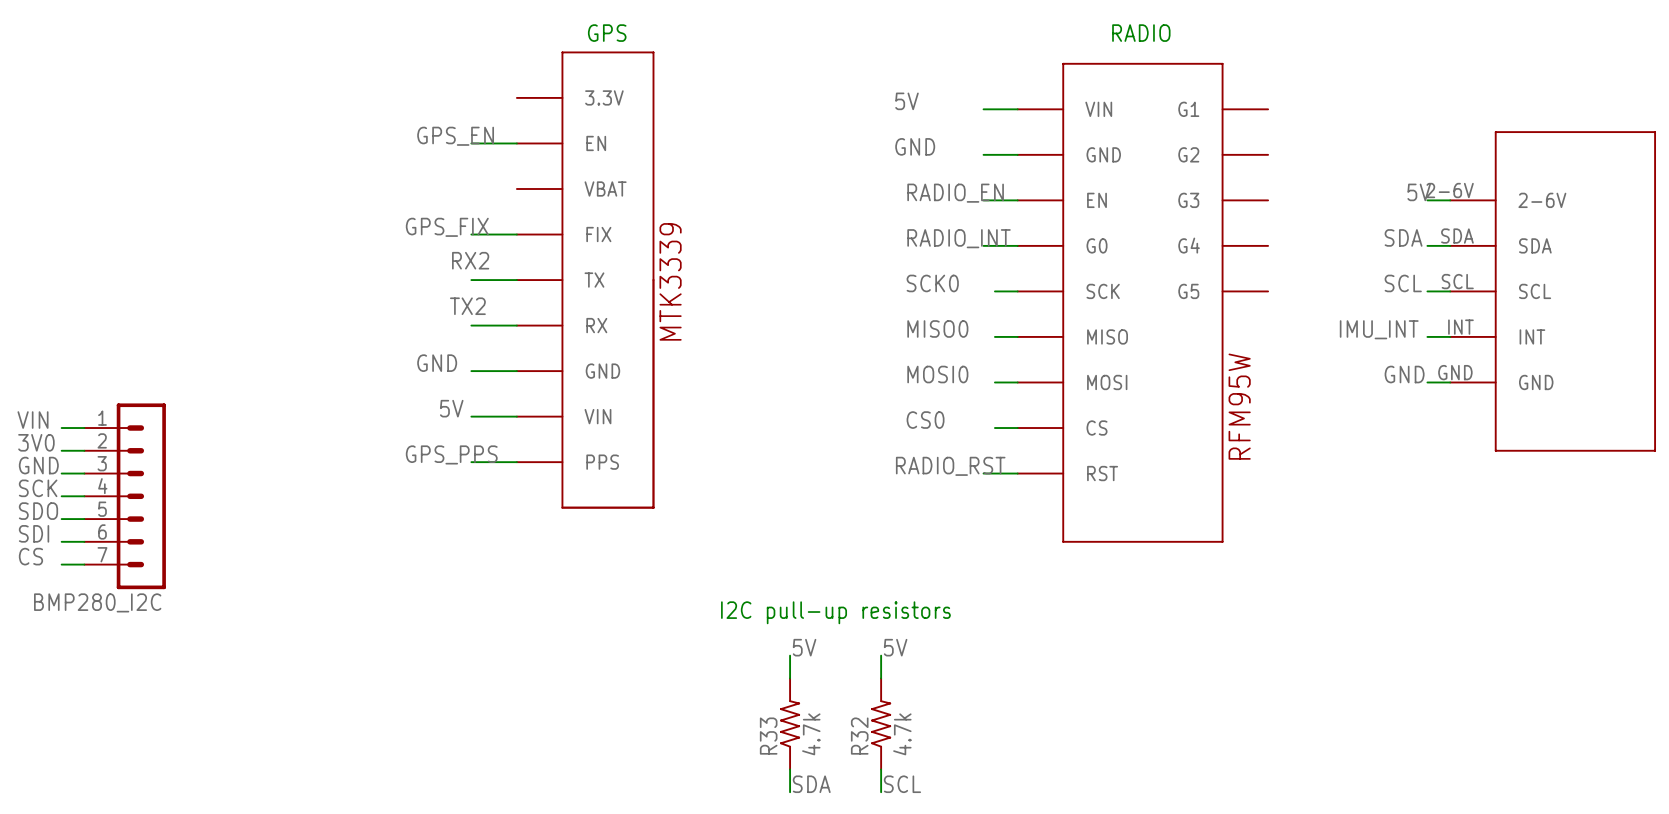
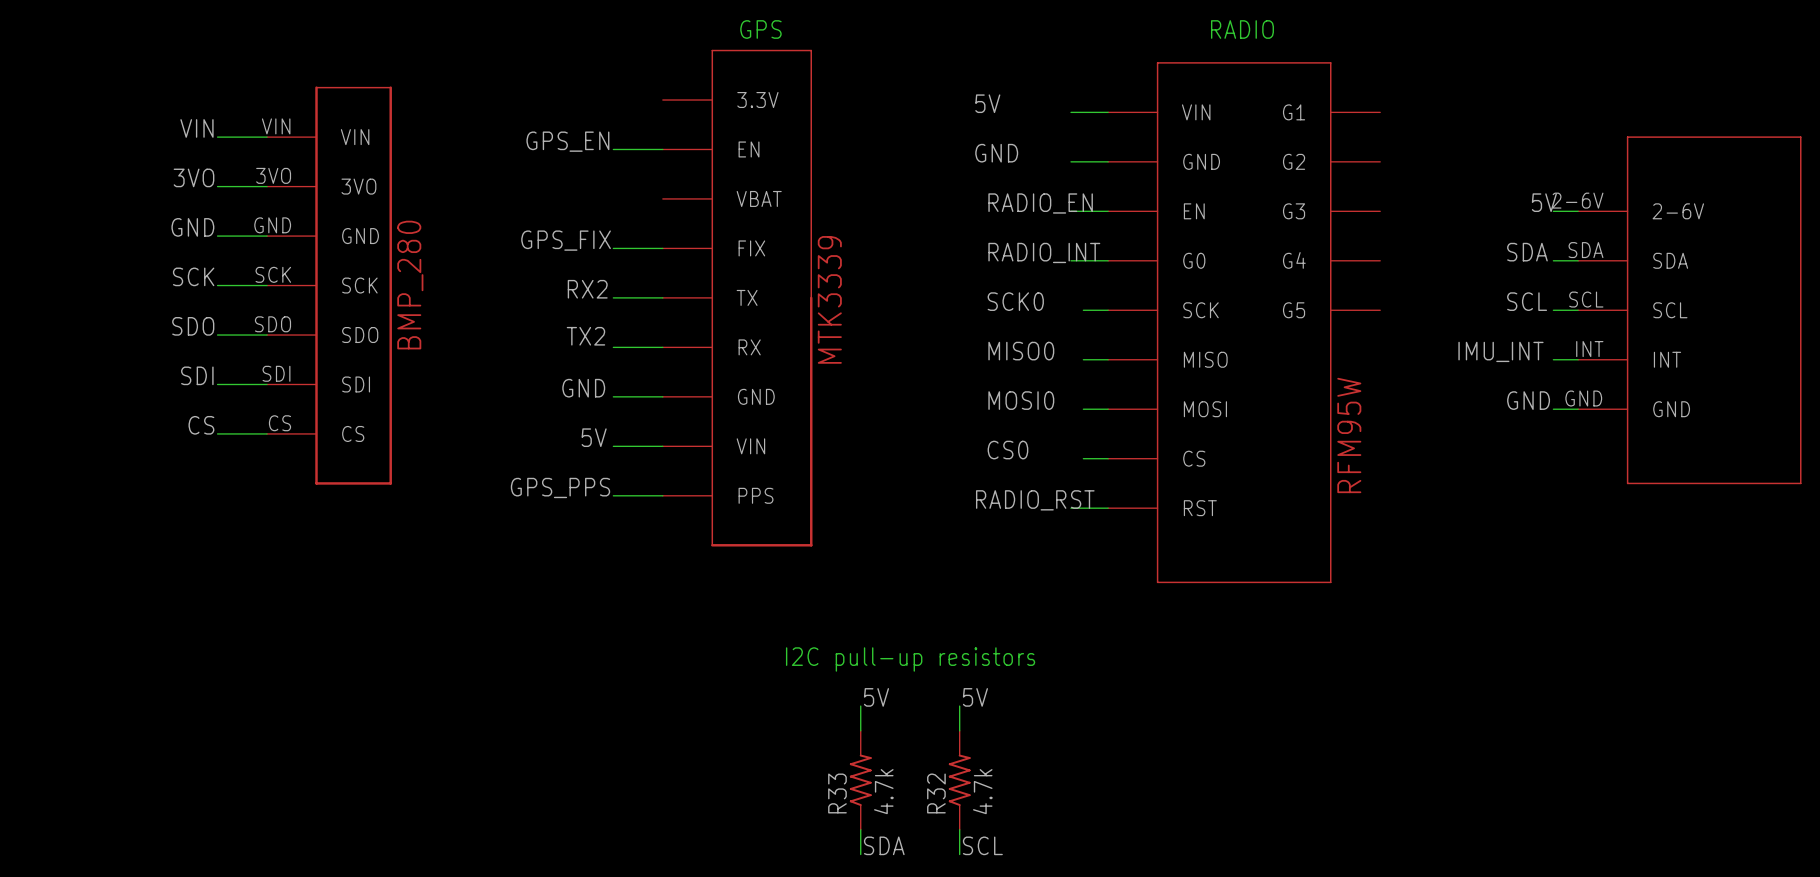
text position: GPS (607, 33) -> GPS (760, 29)
label: none -> VIN (196, 128)
wire: none -> (217, 137) (267, 137)
label position: GPS_EN (455, 136) -> GPS_EN (567, 141)
wire: (471, 143) (516, 143) -> (613, 149) (662, 149)
label: none -> 3VO (194, 177)
wire: none -> (217, 186) (267, 186)
label: none -> GND (192, 227)
wire: none -> (217, 236) (267, 236)
label position: GPS_FIX (447, 227) -> GPS_FIX (566, 240)
wire: (471, 234) (516, 234) -> (613, 248) (662, 248)
label: none -> SCK (193, 276)
label position: RX2 (470, 260) -> RX2 (587, 289)
wire: none -> (217, 285) (267, 285)
part: none -> (329, 285)
wire: (471, 280) (516, 280) -> (613, 297) (662, 297)
part position: (585, 280) -> (737, 298)
label: none -> SDO (193, 326)
label position: TX2 (467, 306) -> TX2 (585, 336)
wire: none -> (217, 335) (267, 335)
wire: (471, 325) (516, 325) -> (613, 347) (662, 347)
label: none -> SDI (197, 375)
wire: none -> (217, 384) (267, 384)
label: GND (437, 363) -> none
label: none -> GND (583, 388)
wire: (471, 371) (516, 371) -> (613, 396) (662, 396)
label: none -> CS (201, 425)
wire: none -> (217, 433) (267, 433)
label position: 5V (451, 408) -> 5V (594, 437)
wire: (471, 416) (516, 416) -> (613, 446) (662, 446)
label: VIN (33, 420) -> none
wire: (61, 428) (84, 428) -> none
label: 3V0 (36, 442) -> none
wire: (61, 450) (84, 450) -> none
label position: GPS_PPS (451, 454) -> GPS_PPS (560, 487)
wire: (471, 462) (516, 462) -> (613, 495) (662, 495)
label: GND (38, 465) -> none
wire: (61, 473) (84, 473) -> none
label: SCK (38, 488) -> none
wire: (61, 496) (84, 496) -> none
BMP280_I2C: (125, 496) -> none
label: SDO (38, 511) -> none
wire: (61, 519) (84, 519) -> none
label: SDI (34, 533) -> none
wire: (61, 541) (84, 541) -> none
label: CS (30, 556) -> none
wire: (61, 564) (84, 564) -> none

